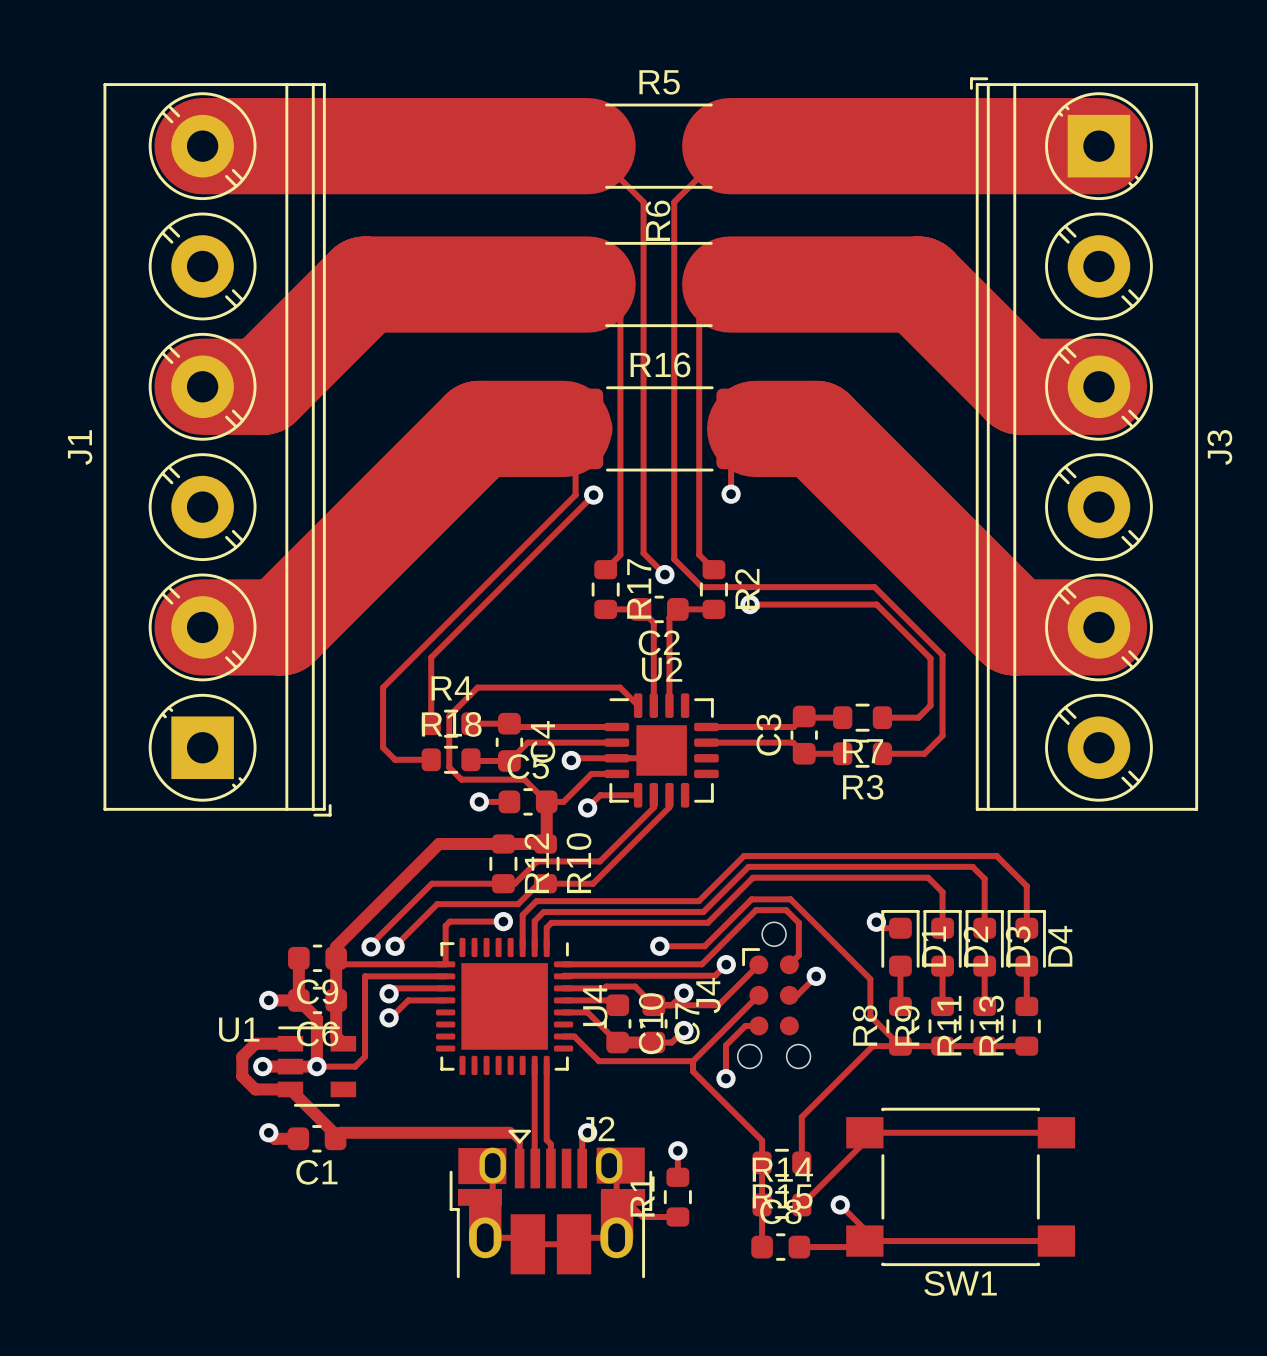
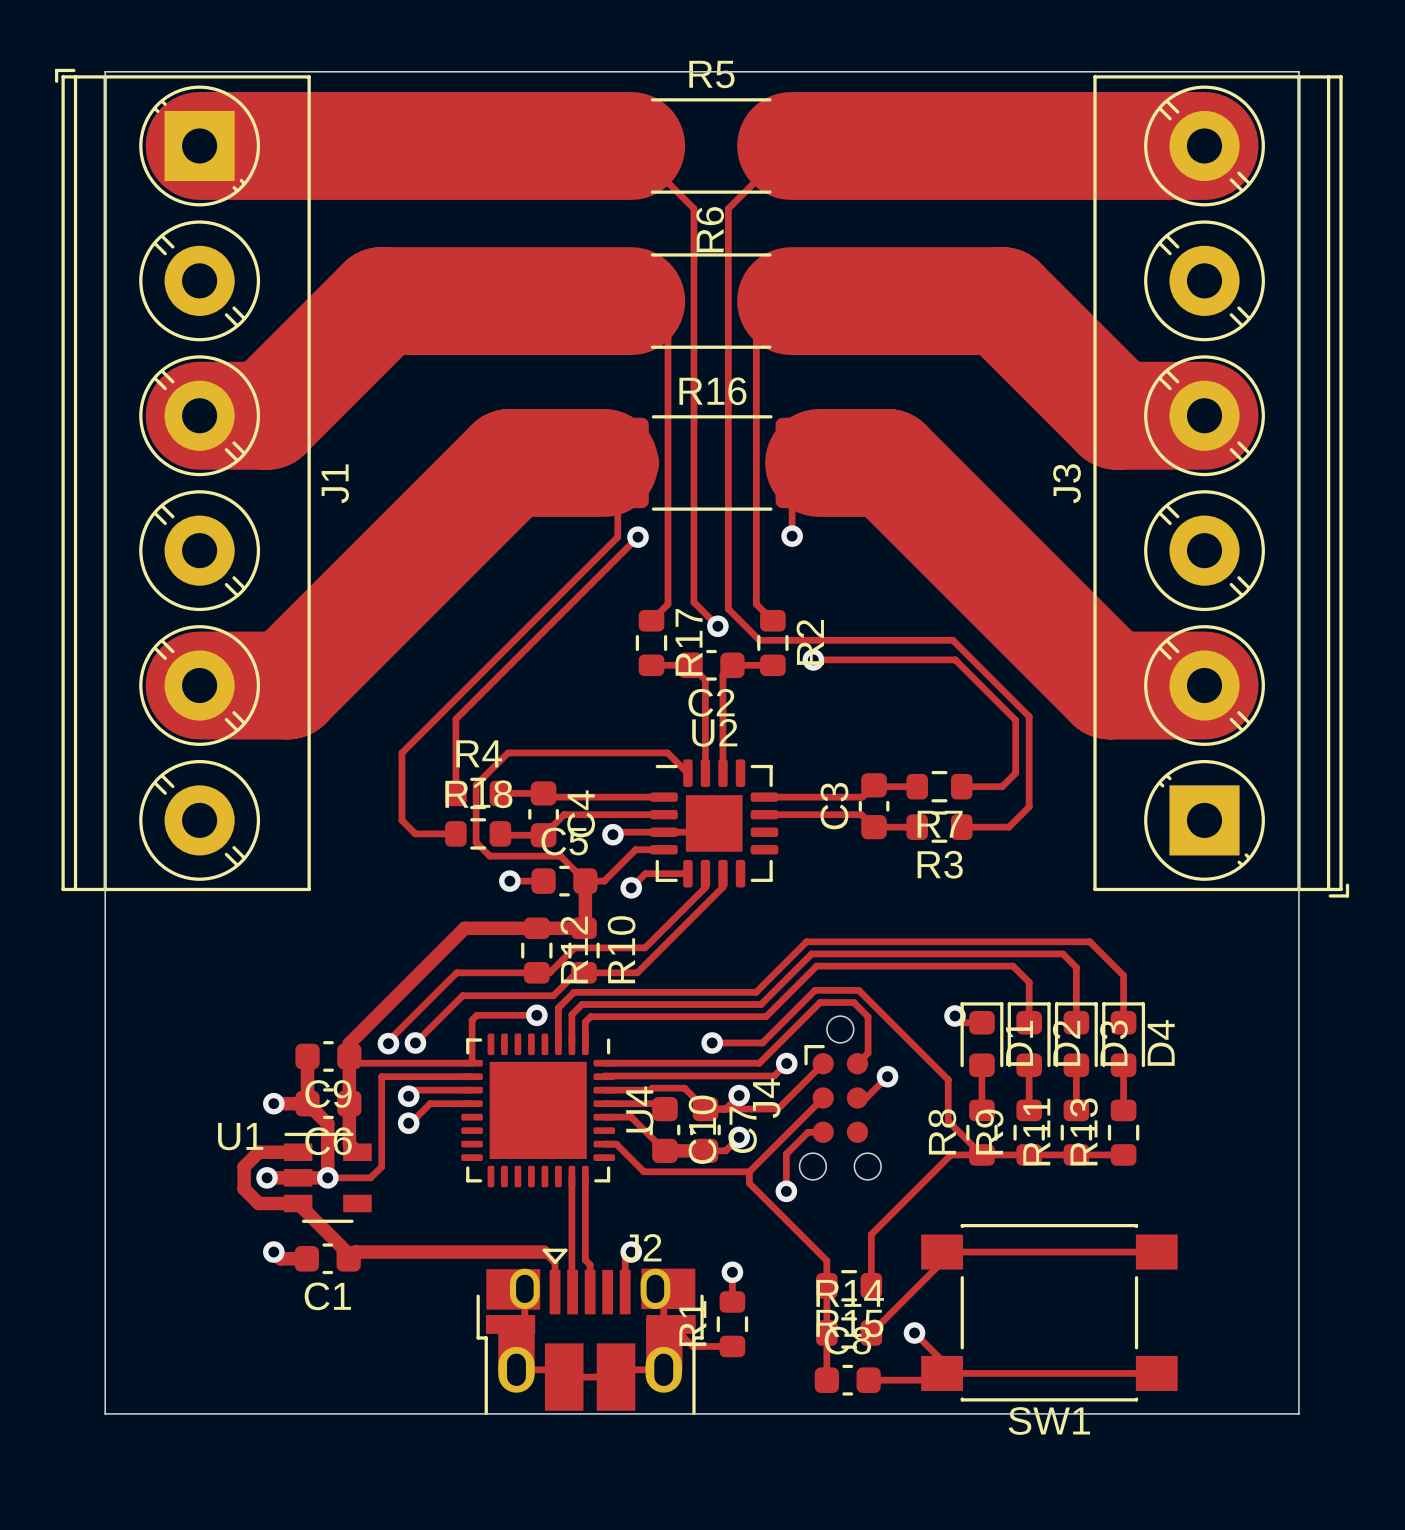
board edge: none -> (105, 71) (105, 1413) (1298, 1413) (1298, 71) (105, 71)
J3 rotation: 0° (1084, 444) -> 180° (1221, 486)
J1 rotation: 0° (217, 449) -> 180° (182, 479)

